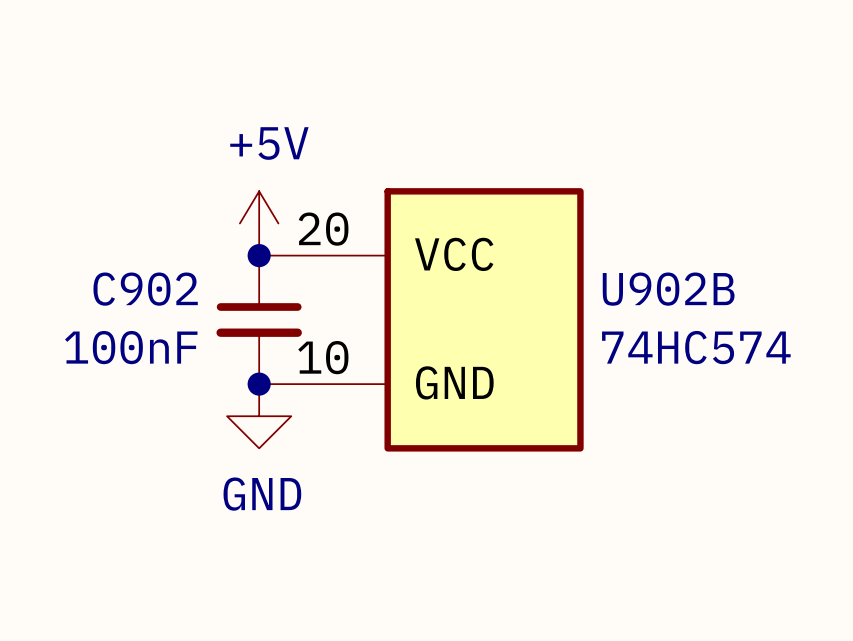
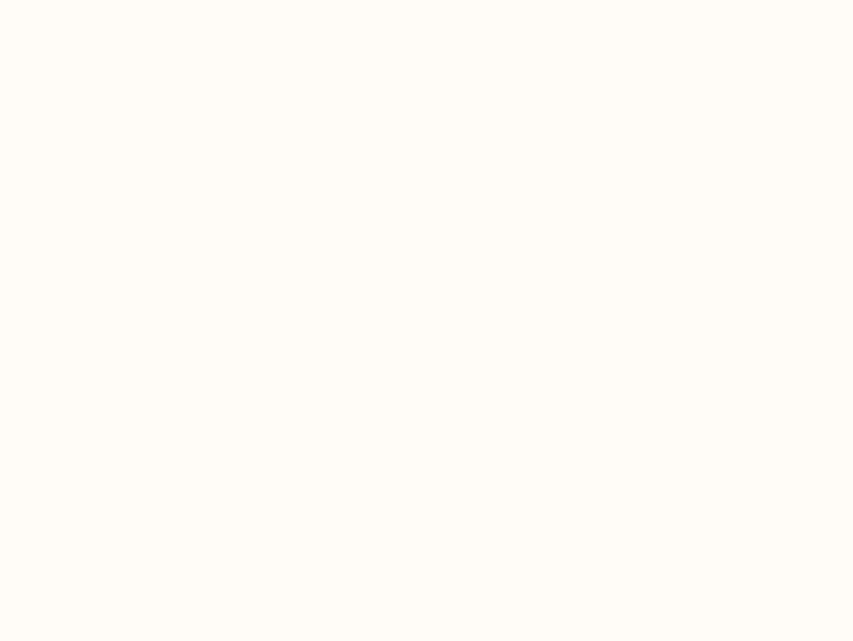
power symbol: +5V (259, 223) -> none
junction: (259, 255) -> none
C902: 100nF (259, 319) -> none
U902B: 74HC574 (421, 319) -> none
junction: (259, 384) -> none
power symbol: GND (259, 416) -> none

